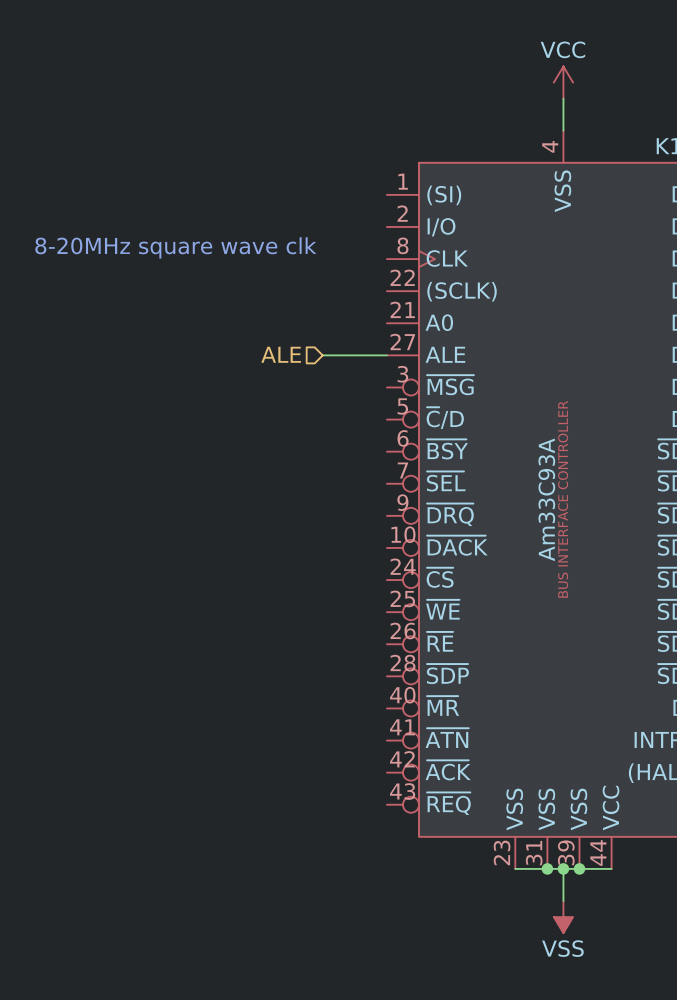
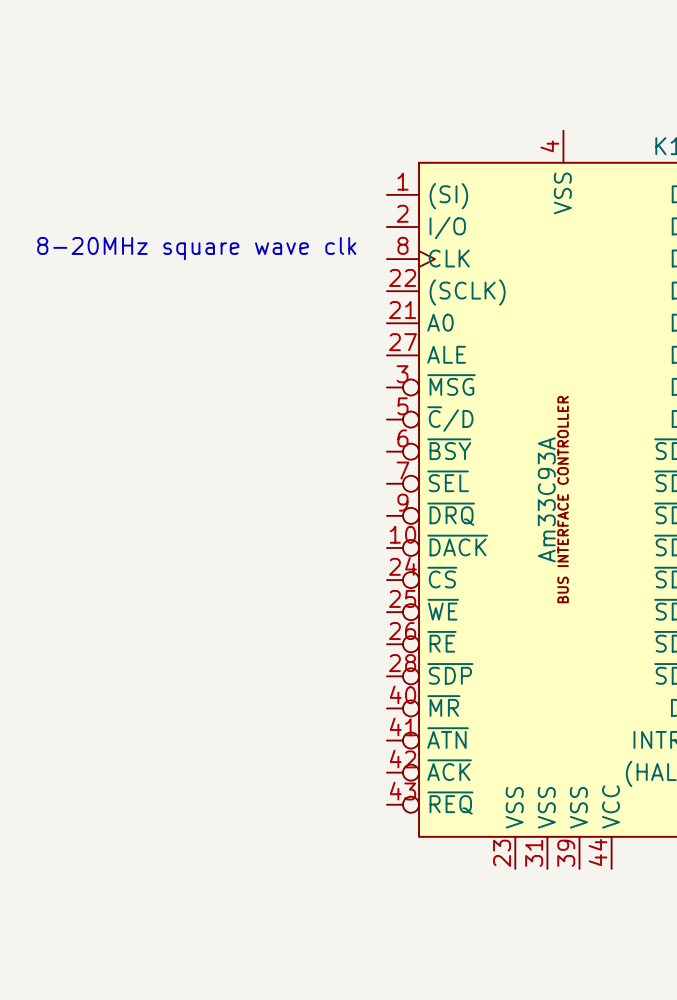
power symbol: VCC (563, 82) -> none
wire: (563, 98) (563, 130) -> none
hierarchical label: ALE (281, 354) -> none
wire: (322, 355) (386, 355) -> none
wire: (515, 868) (611, 868) -> none
junction: (547, 868) -> none
wire: (563, 868) (563, 901) -> none
junction: (563, 868) -> none
junction: (579, 868) -> none
power symbol: VSS (563, 917) -> none

